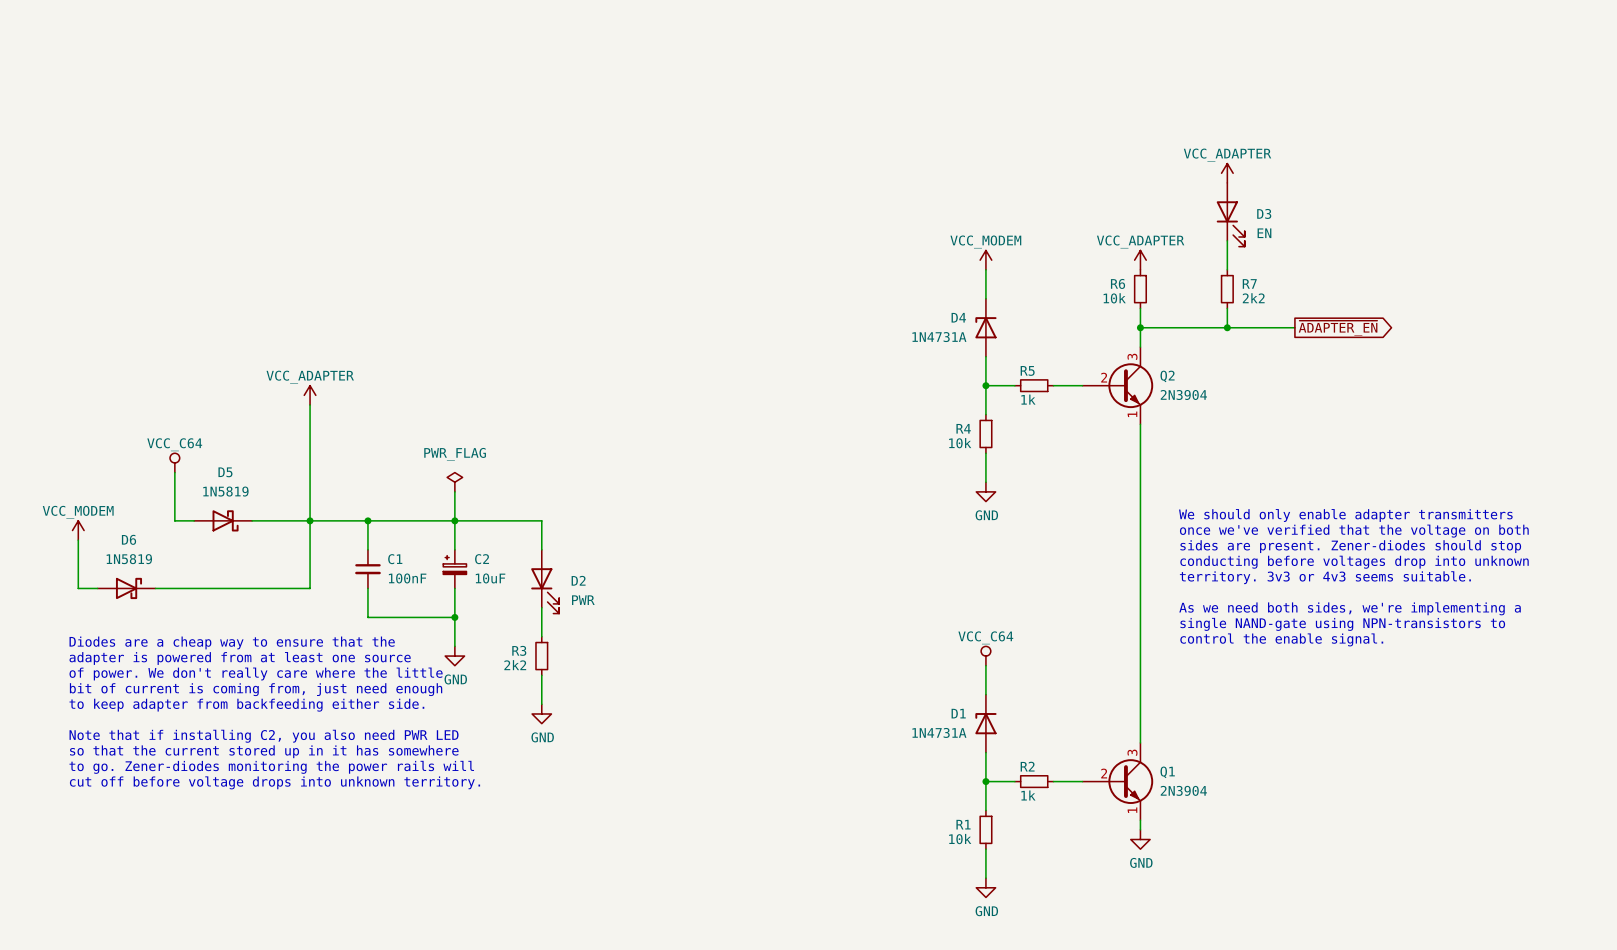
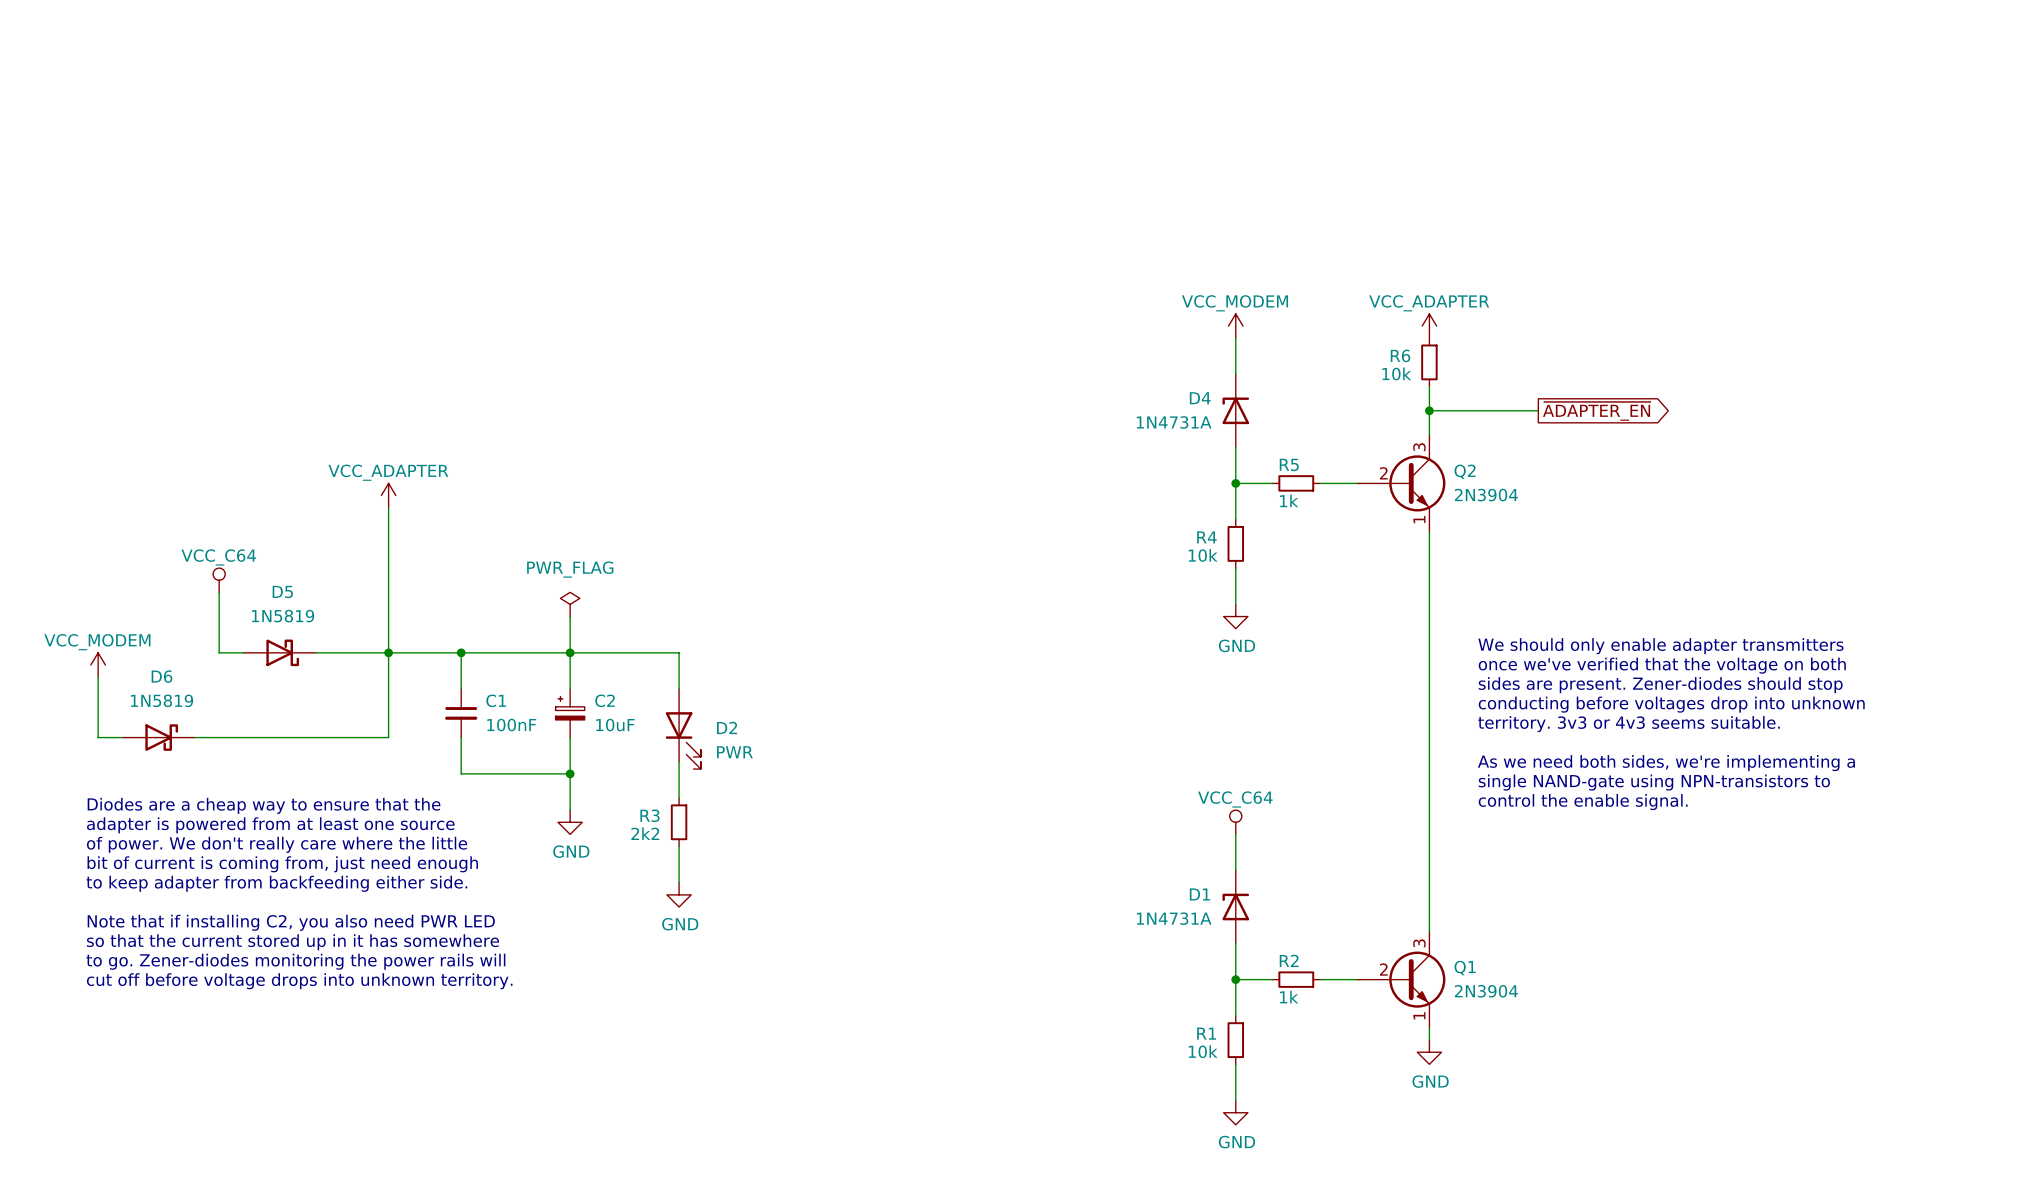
power symbol: VCC_ADAPTER (1227, 173) -> none
D3: EN (1230, 214) -> none
wire: (1227, 240) (1227, 269) -> none
R7: 2k2 (1227, 289) -> none
wire: (1227, 308) (1227, 327) (1294, 327) -> none
junction: (1227, 327) -> none
global label position: ~{ADAPTER_EN} (1338, 328) -> ~{ADAPTER_EN} (1596, 411)

